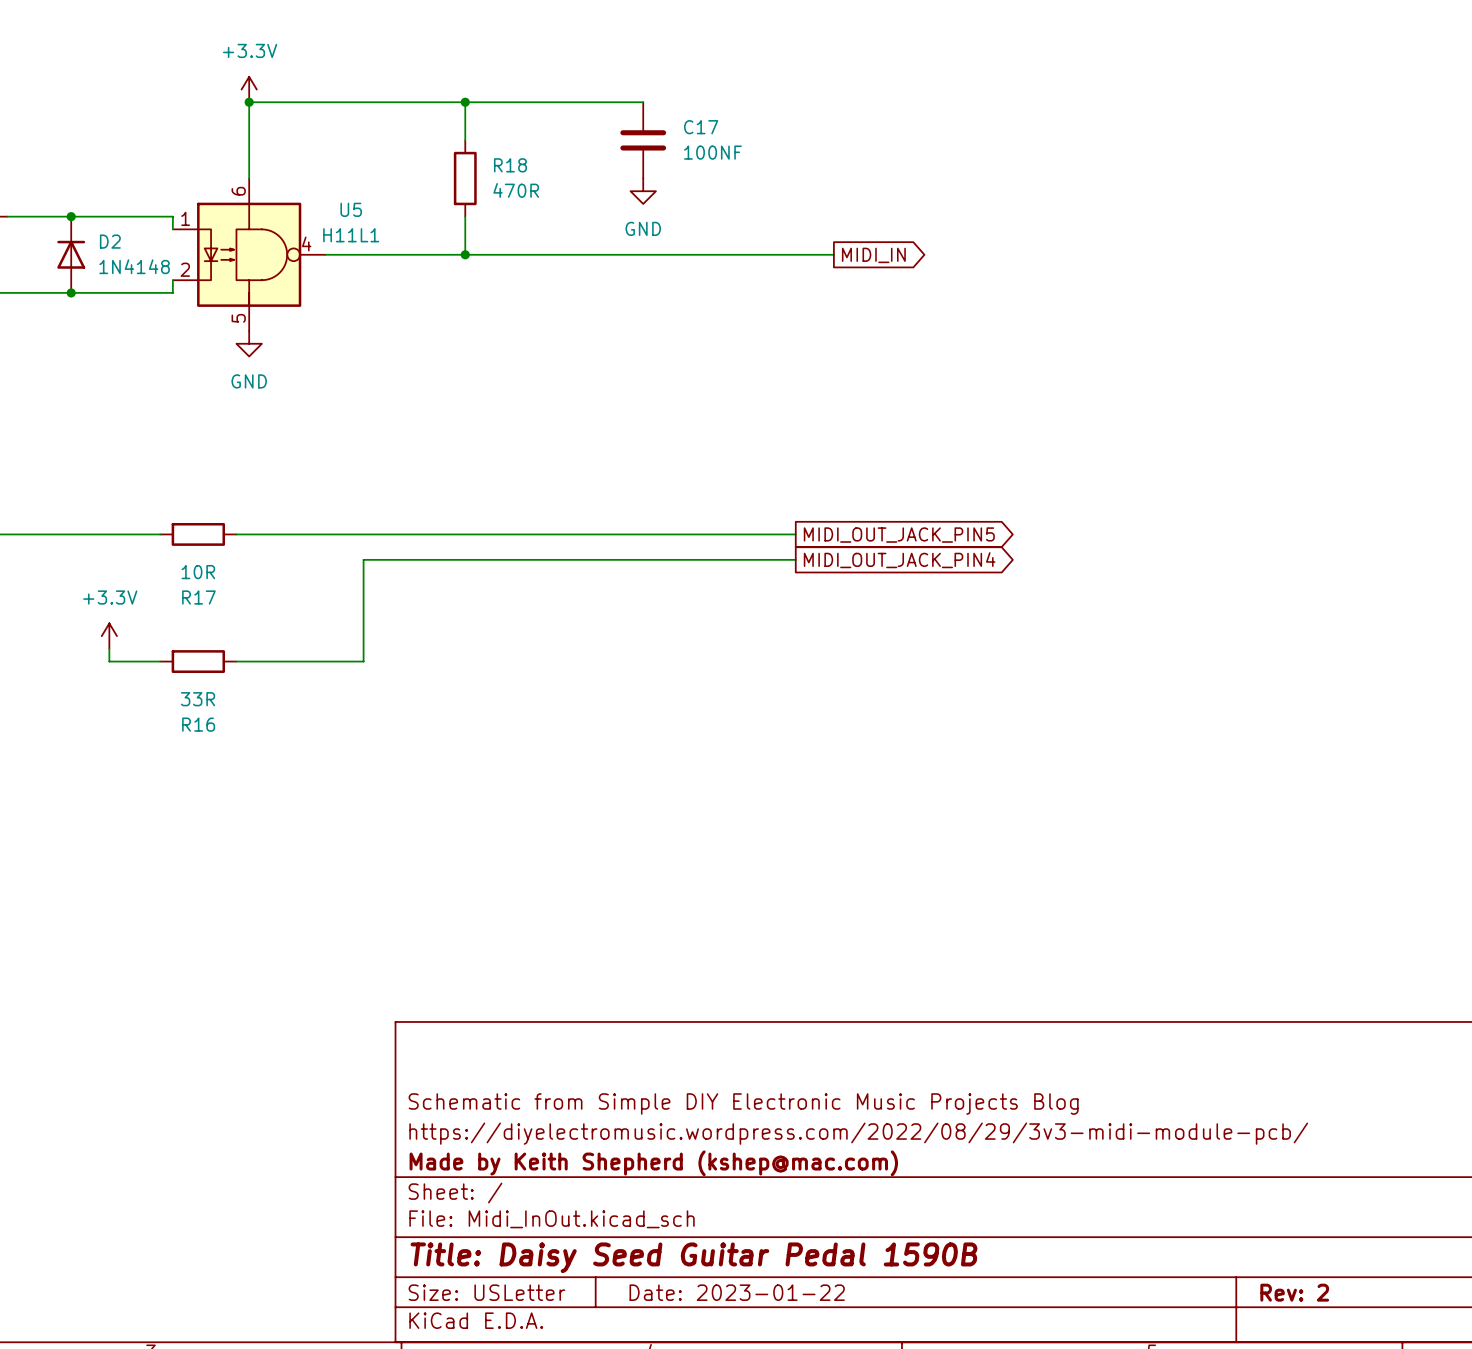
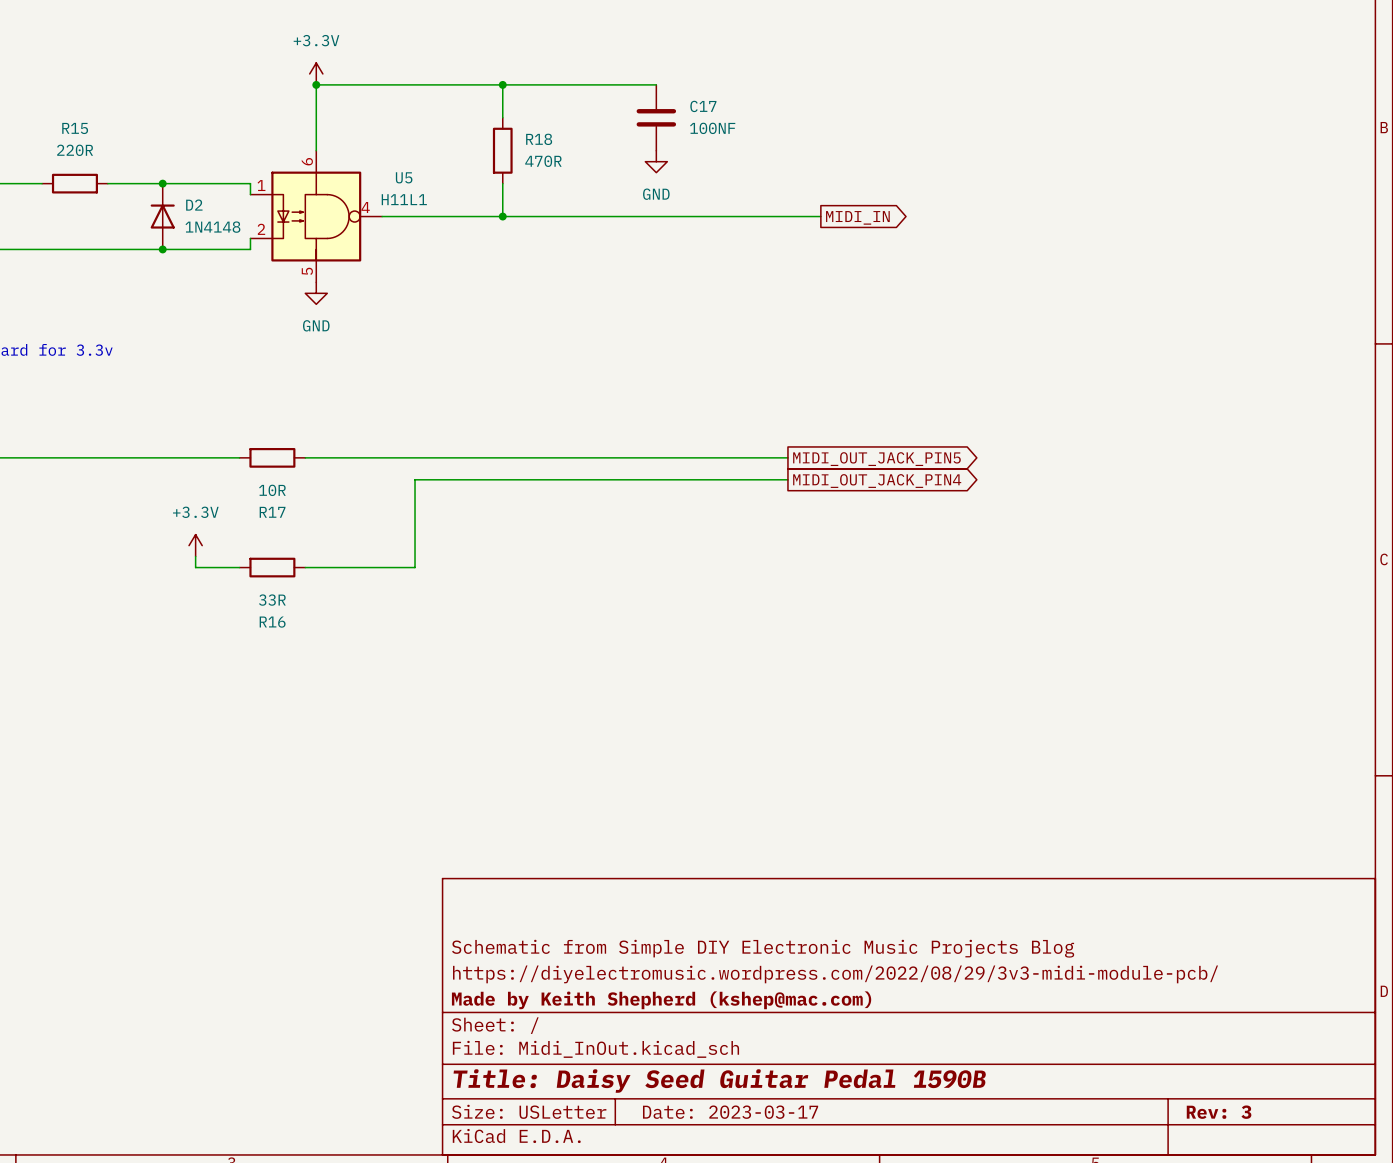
title block: Date: 2023-01-22 (737, 1292) -> Date: 2023-03-17 (730, 1112)
title block: Rev: 2 (1294, 1292) -> Rev: 3 (1219, 1112)

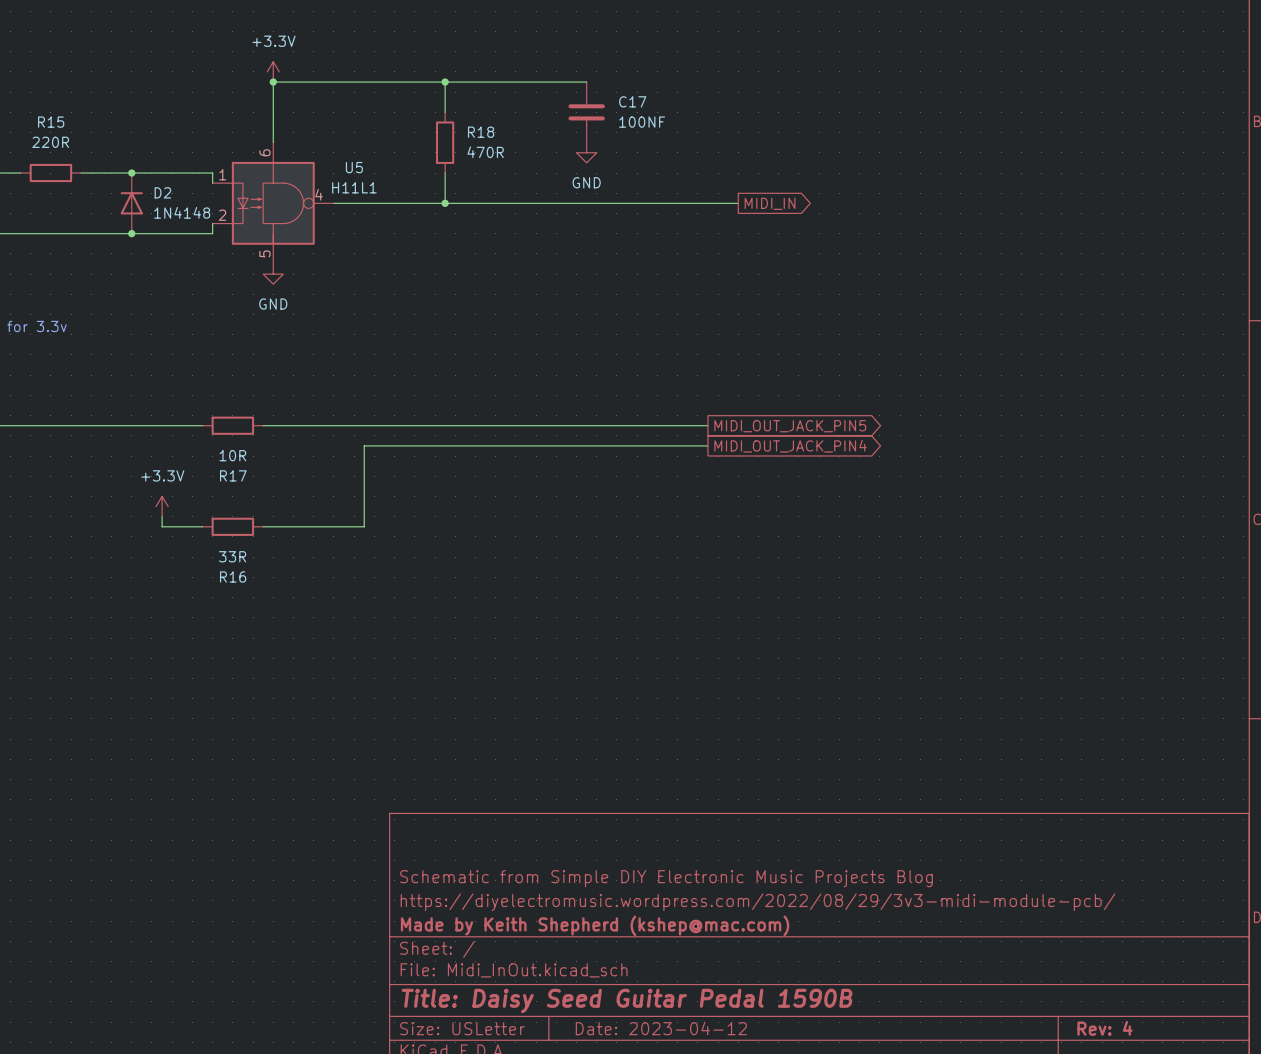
title block: Date: 2023-03-17 (730, 1112) -> Date: 2023-04-12 (661, 1028)
title block: Rev: 3 (1219, 1112) -> Rev: 4 (1105, 1028)

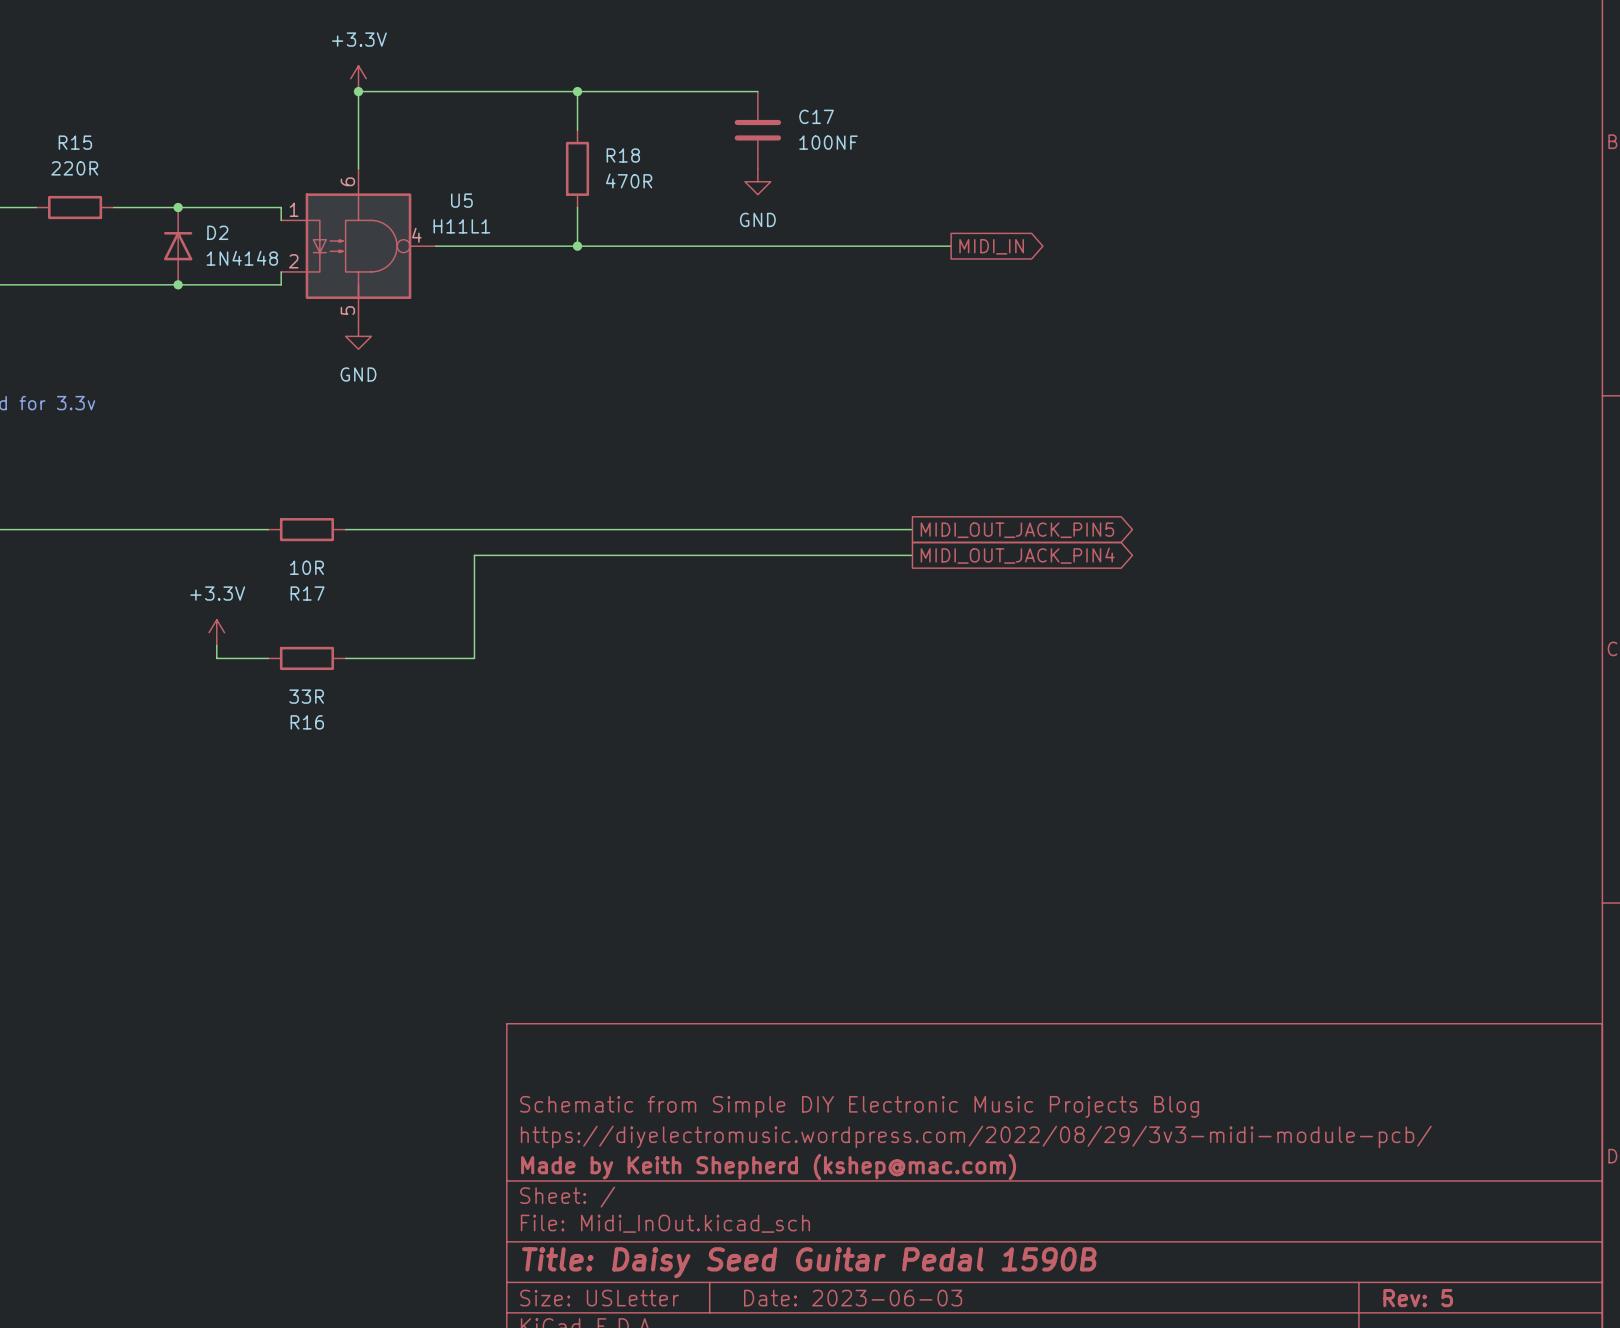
title block: Date: 2023-04-12 (661, 1028) -> Date: 2023-06-03 (853, 1298)
title block: Rev: 4 (1105, 1028) -> Rev: 5 (1418, 1298)

